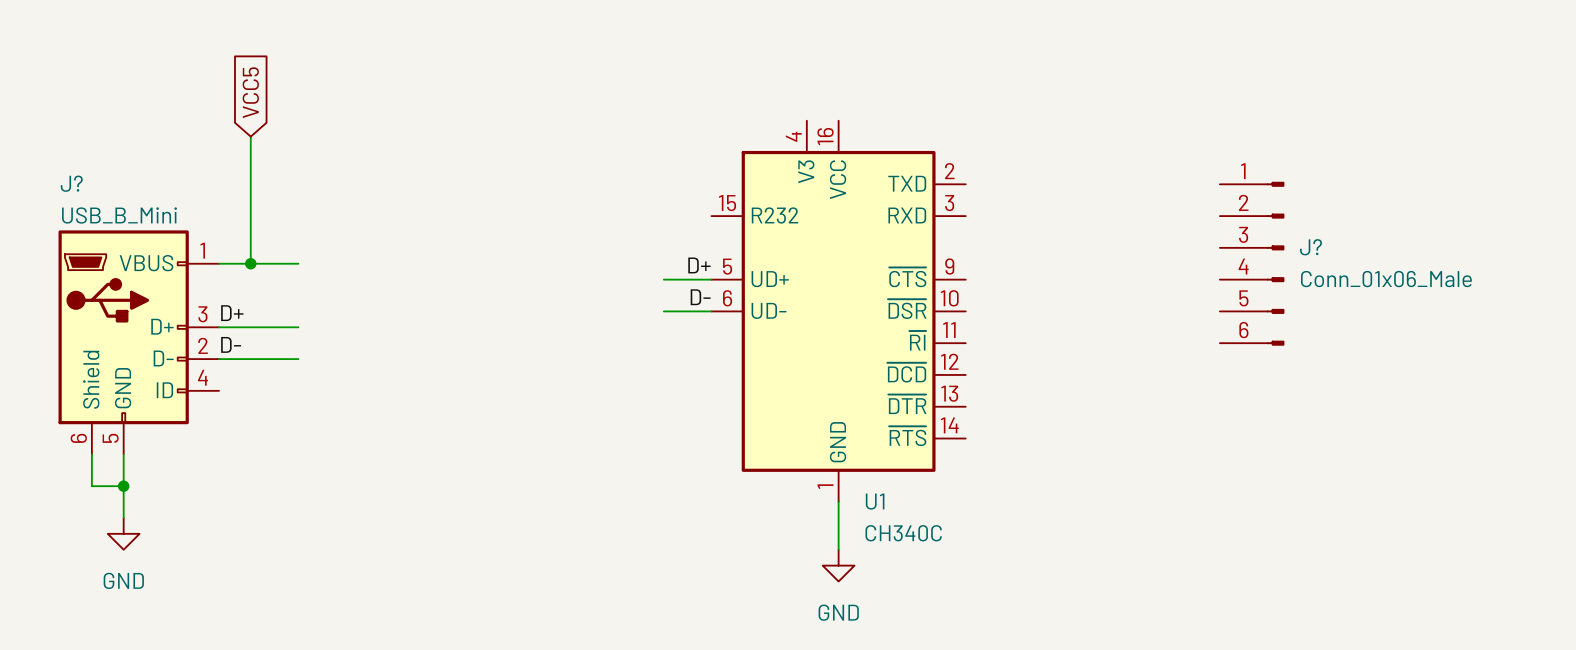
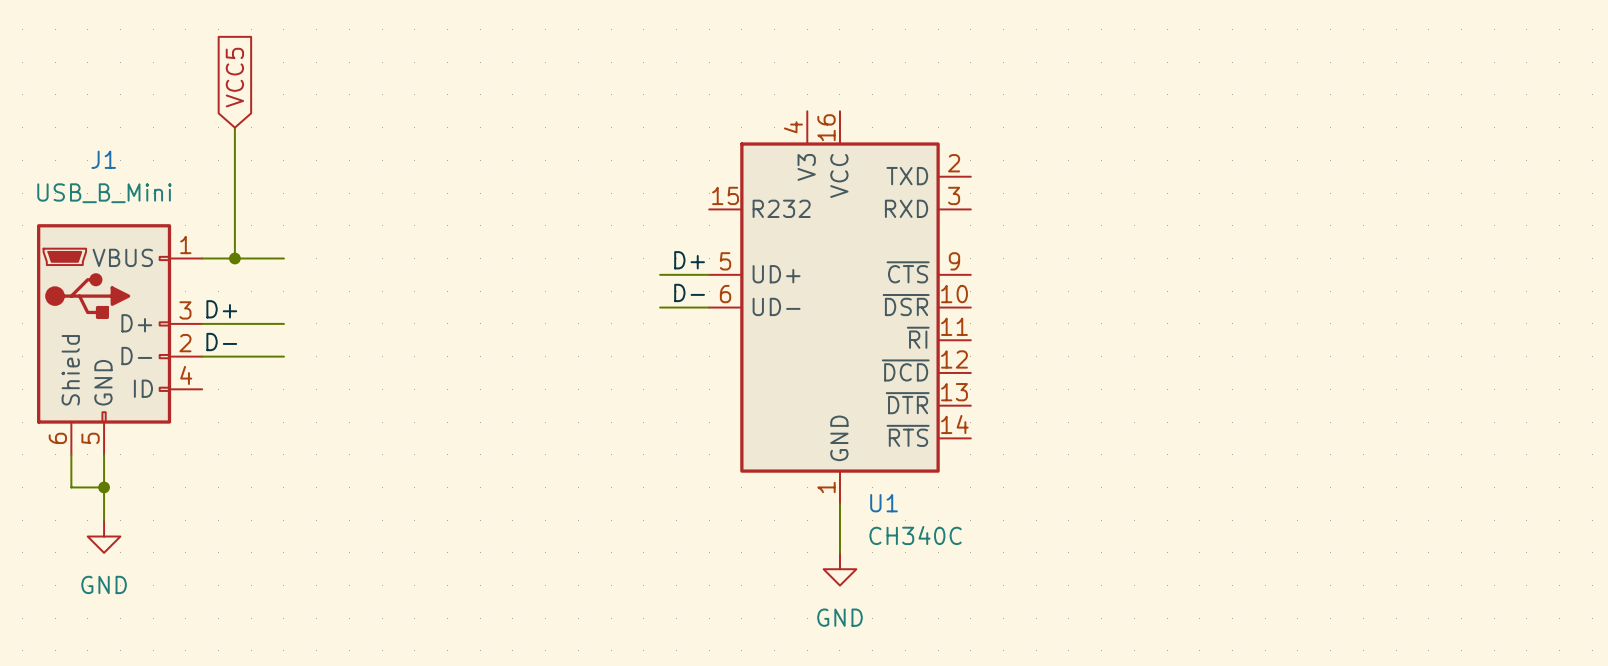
J? name: J? (71, 183) -> J1 (103, 159)
J? value position: USB_B_Mini (119, 215) -> USB_B_Mini (104, 193)
J?: Conn_01x06_Male (1252, 263) -> none

